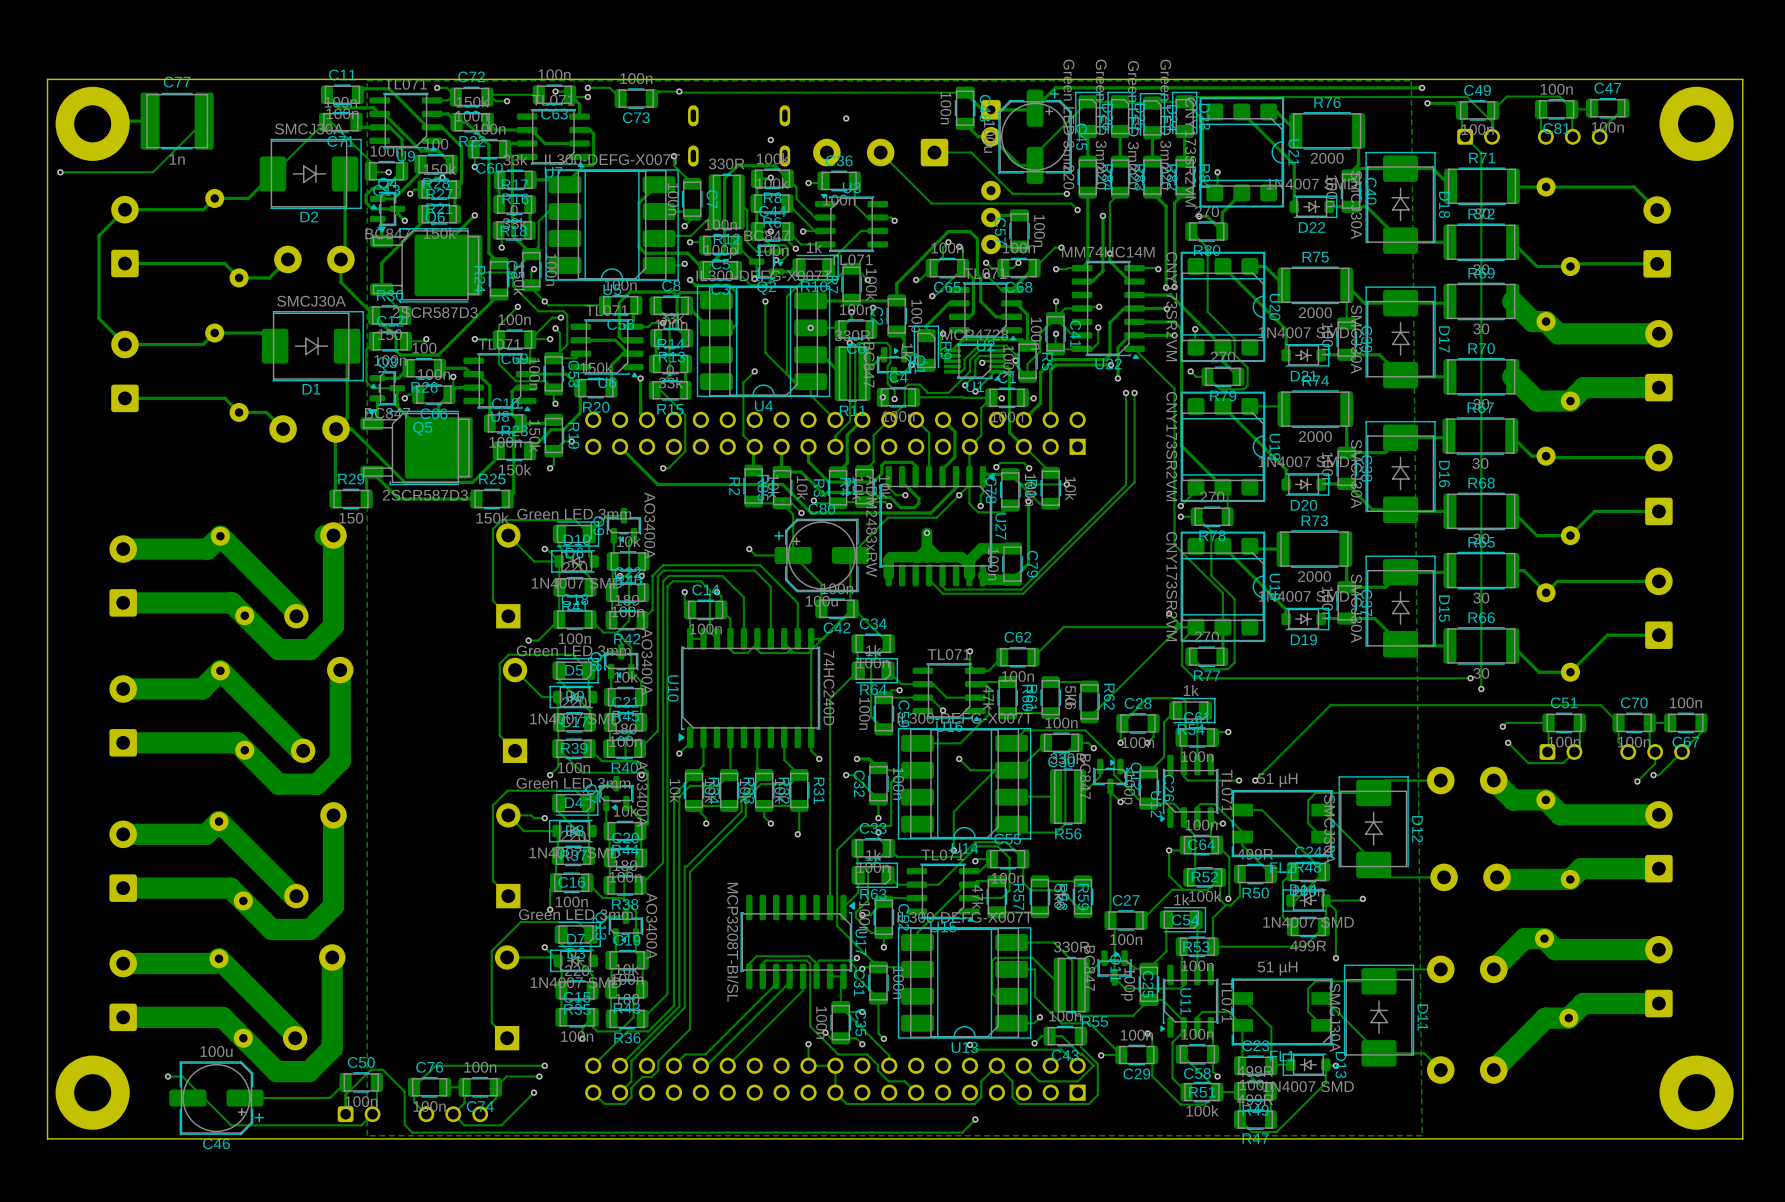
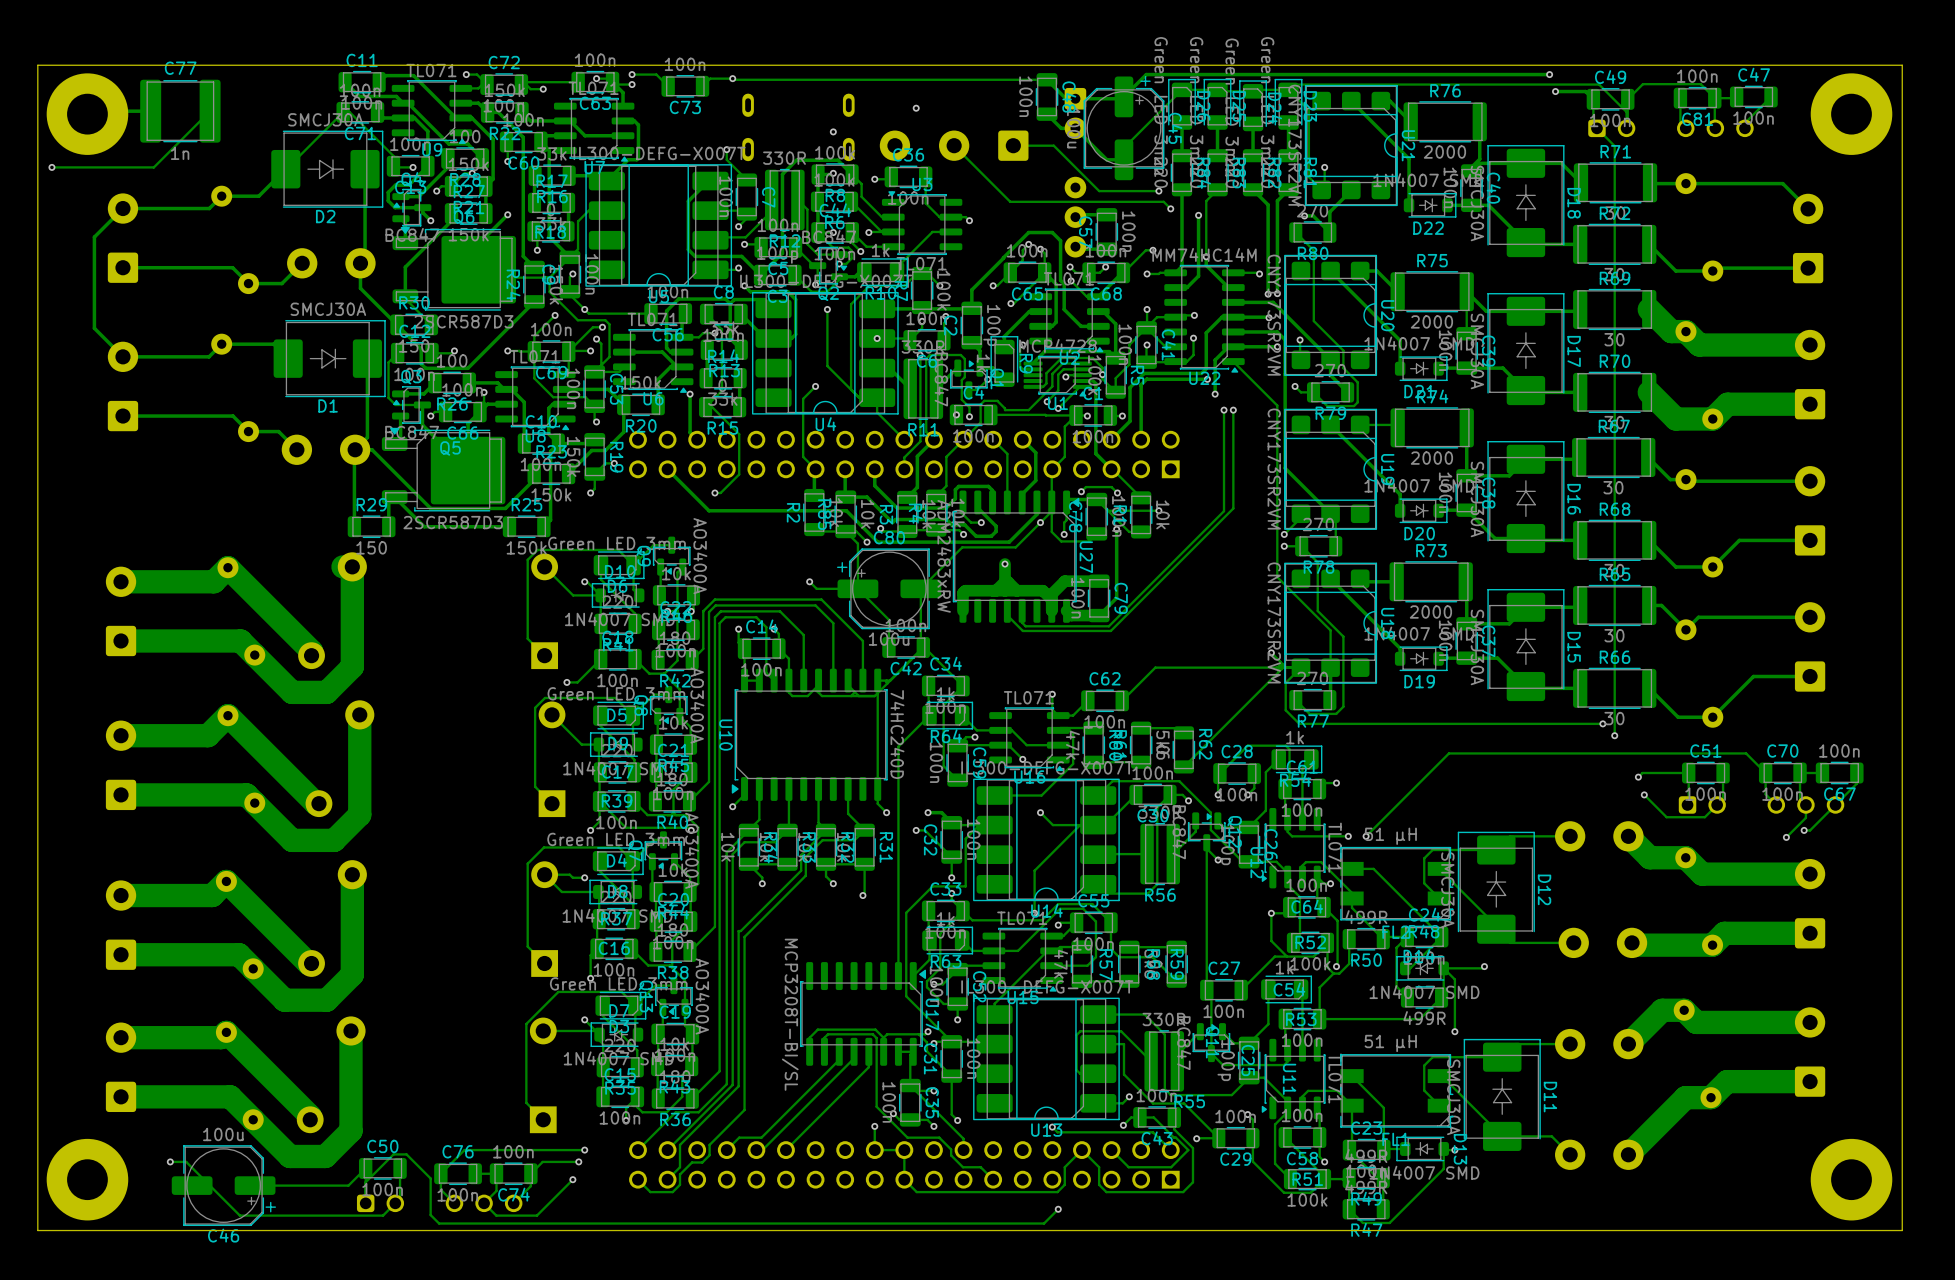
zone outline: (1411, 80) (1422, 1135) (367, 1135) (367, 80) (1411, 80) -> none

